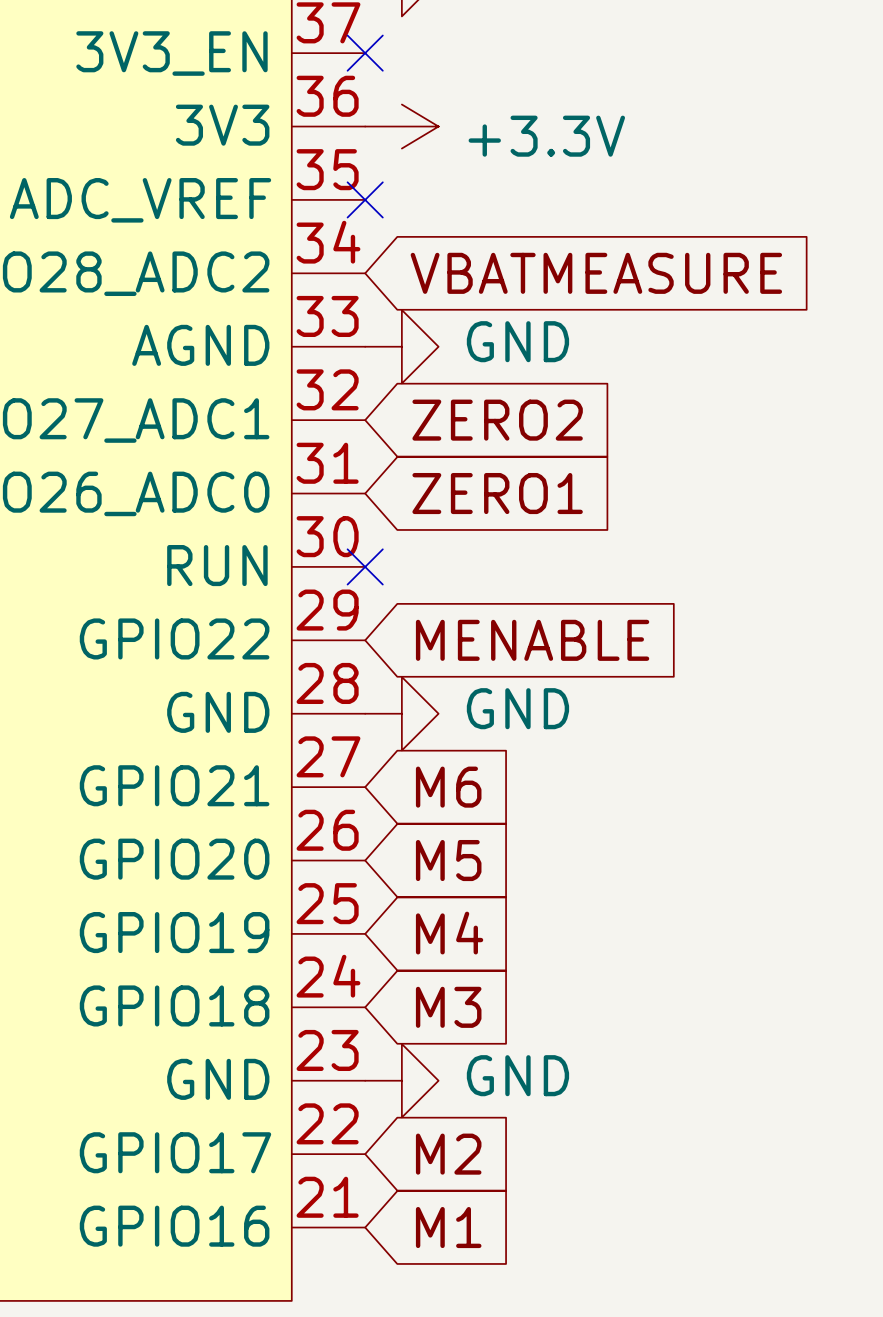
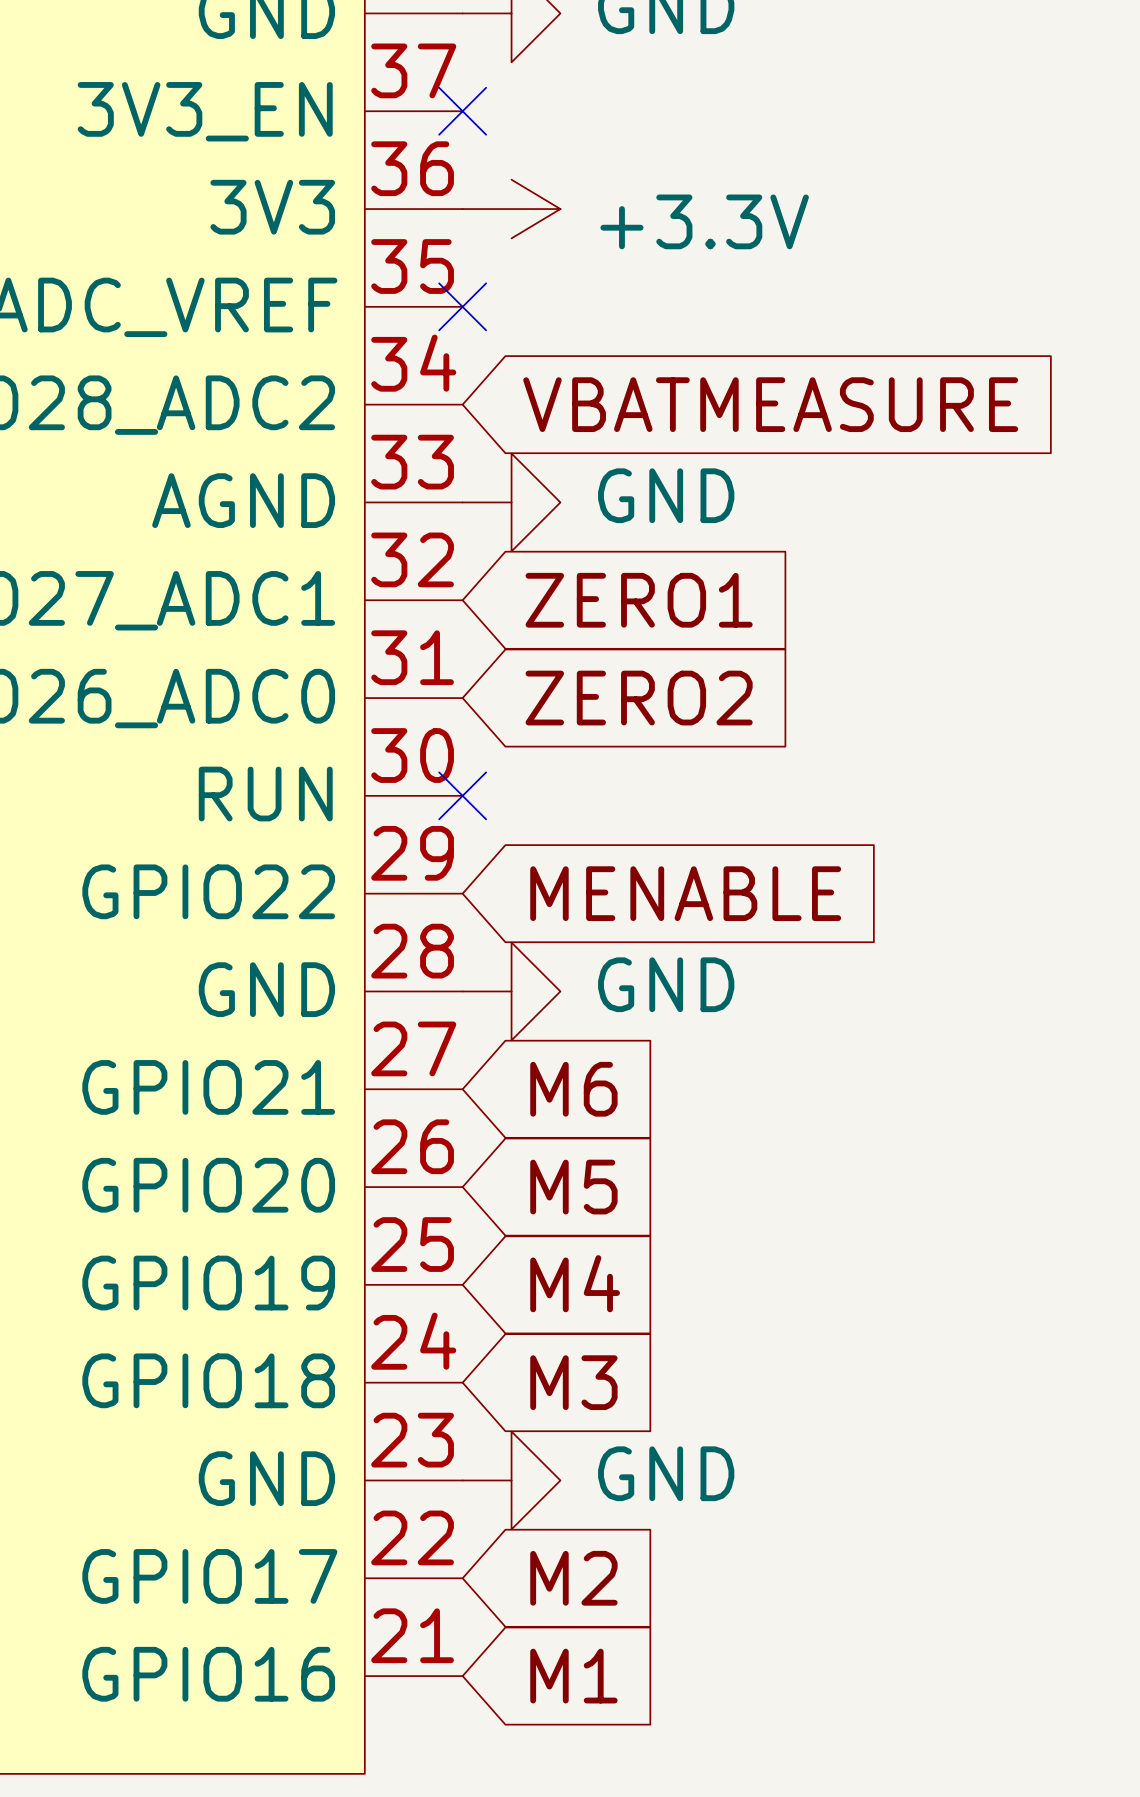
global label: ZERO2 (497, 420) -> ZERO1 (639, 600)
global label: ZERO1 (497, 493) -> ZERO2 (639, 698)

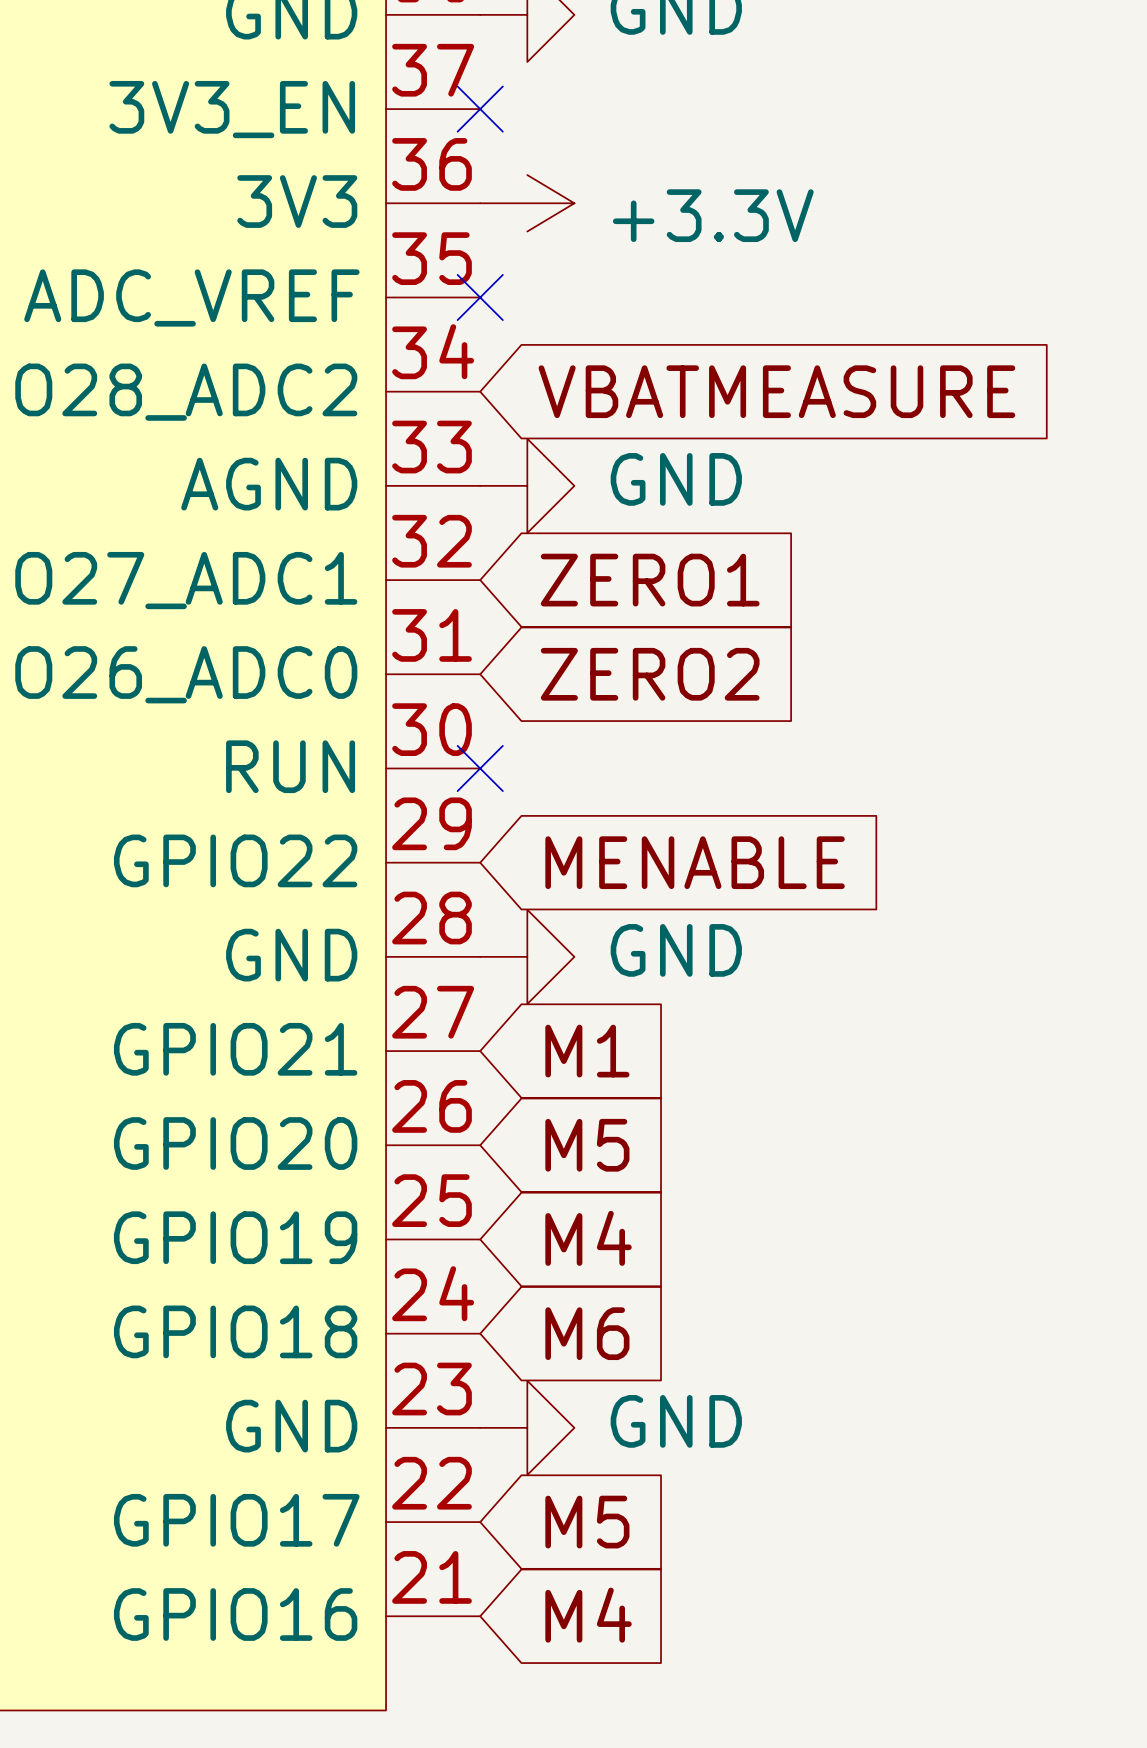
global label: M6 (573, 1089) -> M1 (587, 1051)
global label: M3 (573, 1382) -> M6 (587, 1333)
global label: M2 (573, 1578) -> M5 (587, 1522)
global label: M1 (573, 1676) -> M4 (588, 1615)

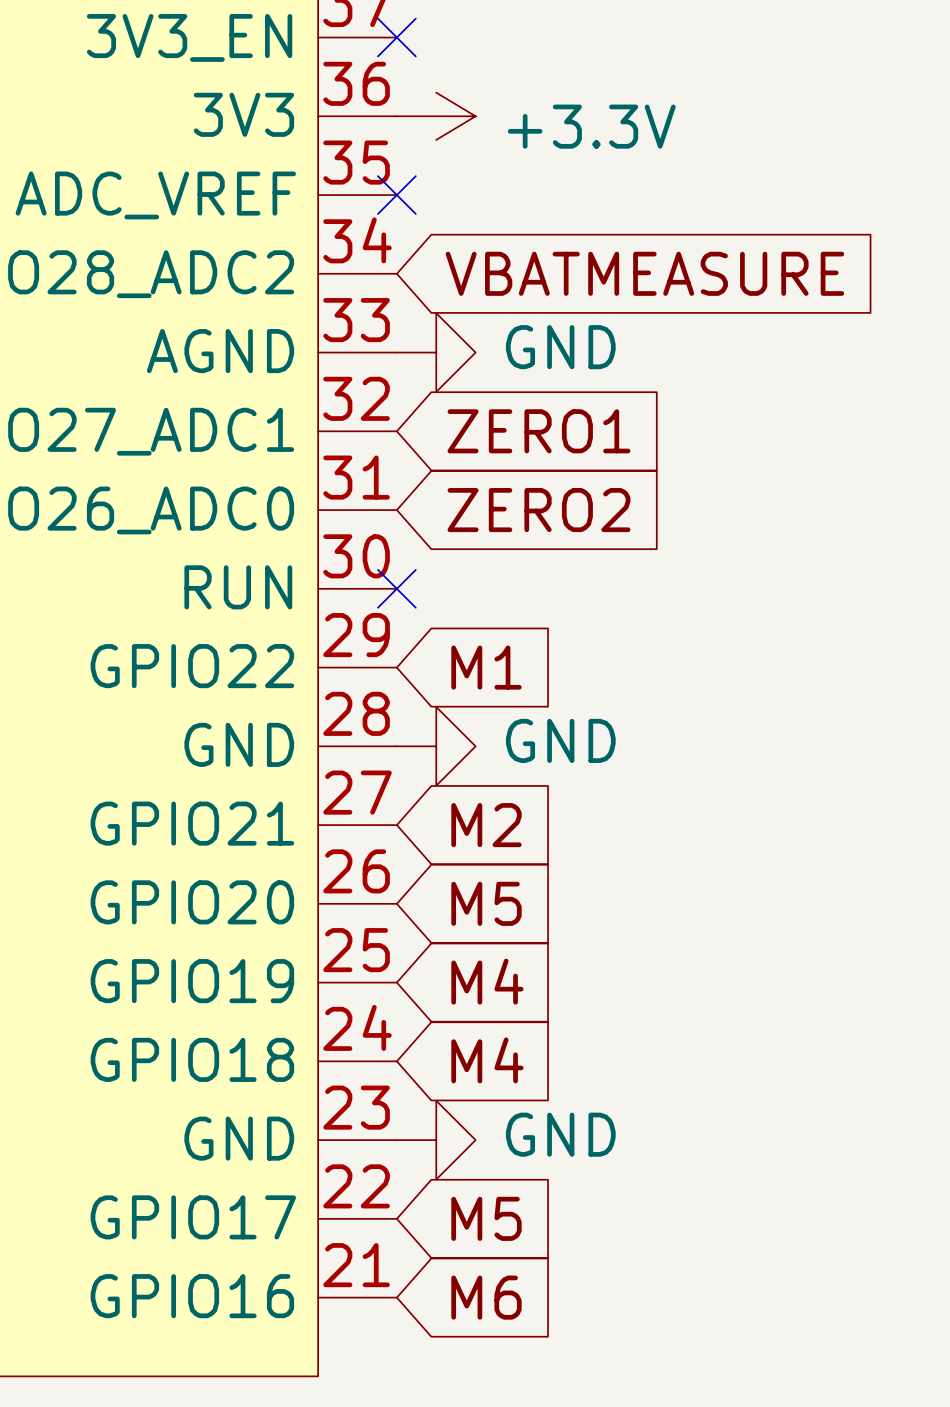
global label: MENABLE (695, 862) -> M1 (486, 667)
global label: M1 (587, 1051) -> M2 (486, 825)
global label: M6 (587, 1333) -> M4 (487, 1060)
global label: M4 (588, 1615) -> M6 (486, 1297)

